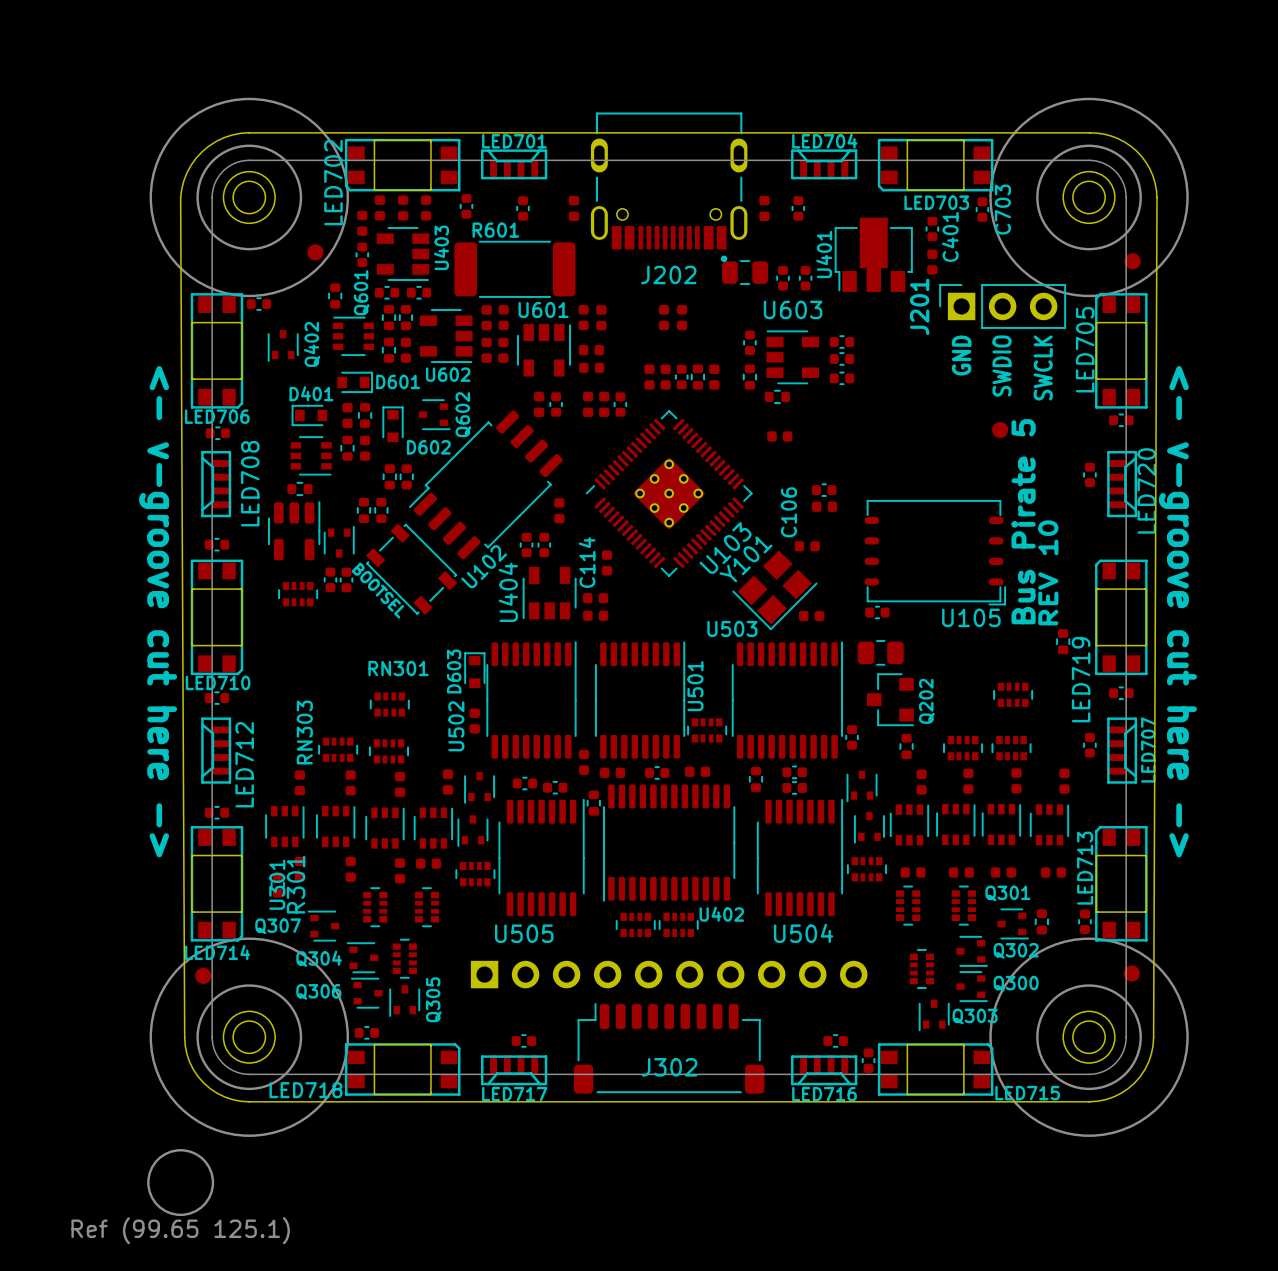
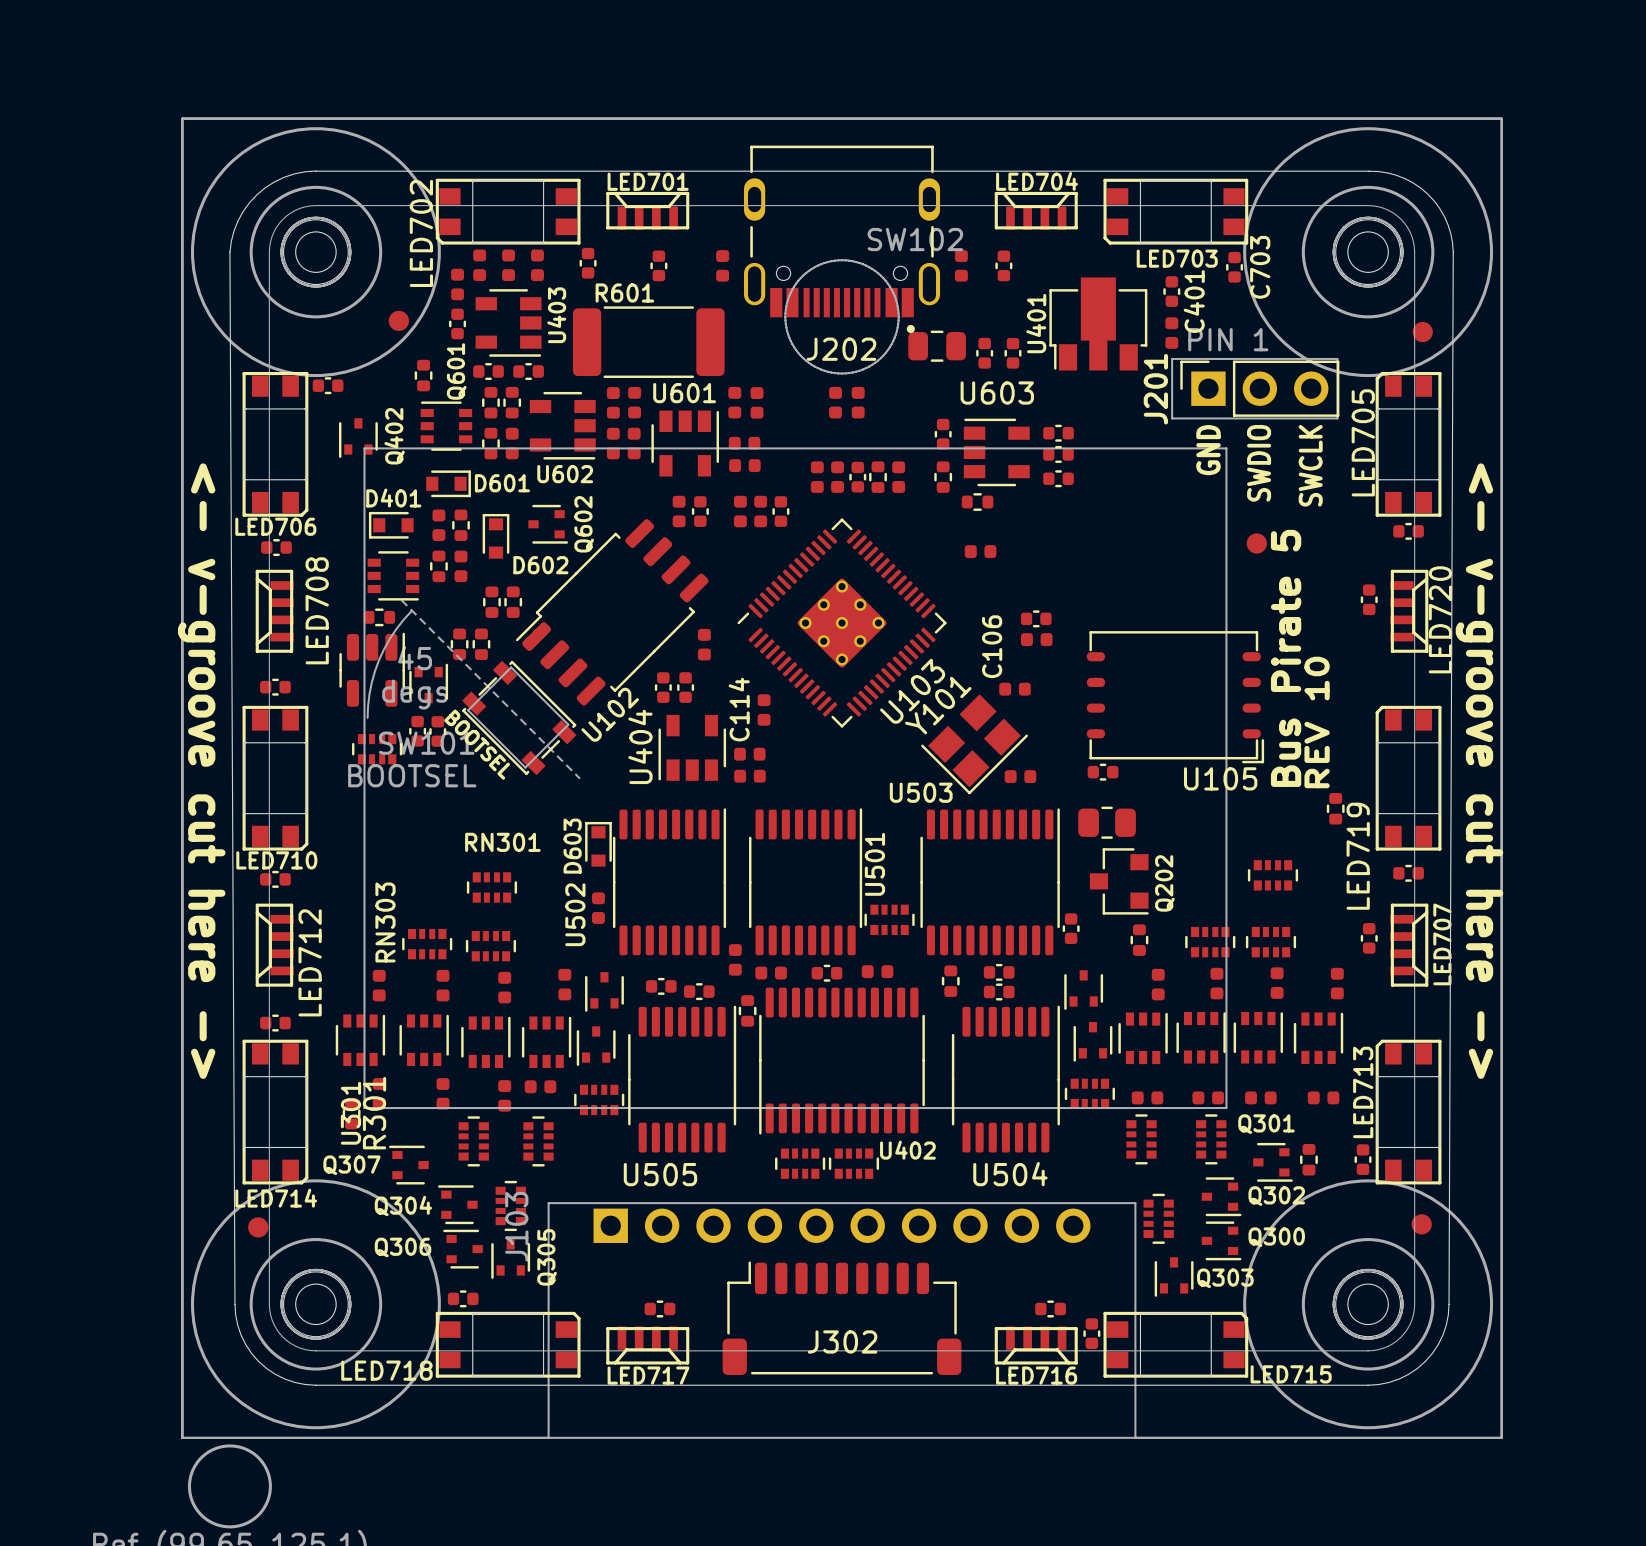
line: none -> (182, 118) (182, 1437) (1501, 1437) (1501, 118) (182, 118)
line: none -> (313, 217) (326, 219) (337, 225) (346, 235) (350, 249) (348, 262) (342, 274) (330, 283) (318, 286) (305, 284) (293, 278) (285, 268) (281, 254) (283, 241) (289, 230) (301, 221) (313, 217)
line: none -> (1365, 217) (1378, 219) (1390, 225) (1398, 235) (1402, 249) (1400, 262) (1394, 274) (1382, 283) (1370, 286) (1357, 284) (1346, 278) (1337, 268) (1333, 254) (1335, 241) (1341, 230) (1353, 221) (1365, 217)
text: none -> SW102 (915, 239)
line: none -> (842, 260) (862, 264) (880, 275) (893, 292) (898, 316) (893, 341) (880, 358) (862, 369) (842, 373) (821, 369) (803, 358) (790, 341) (785, 316) (790, 292) (803, 275) (821, 264) (842, 260)
text: none -> PIN 1 (1228, 339)
line: none -> (1172, 358) (1337, 358) (1337, 418) (1172, 418) (1172, 358)
line: none -> (364, 448) (1226, 448) (1226, 1108) (364, 1108) (364, 448)
line: none -> (401, 600) (579, 778)
line: none -> (412, 610) (396, 628) (379, 659) (369, 694) (367, 717)
text: none -> 45 (415, 658)
line: none -> (511, 667) (568, 724) (525, 767) (468, 710) (511, 667)
text: none -> degs (415, 694)
text: none -> SW101 (426, 743)
text: none -> BOOTSEL (412, 775)
text: none -> J103 (516, 1226)
line: none -> (313, 1269) (326, 1271) (337, 1277) (346, 1287) (350, 1302) (348, 1314) (342, 1326) (332, 1334) (318, 1338) (305, 1337) (293, 1330) (285, 1320) (281, 1306) (283, 1293) (289, 1282) (299, 1274) (313, 1269)
line: none -> (1365, 1269) (1351, 1274) (1341, 1282) (1335, 1293) (1333, 1306) (1337, 1320) (1346, 1330) (1357, 1337) (1370, 1338) (1384, 1334) (1394, 1326) (1400, 1314) (1402, 1302) (1398, 1287) (1390, 1277) (1378, 1271) (1365, 1269)
line: none -> (548, 1437) (548, 1203) (1135, 1203) (1135, 1437)

